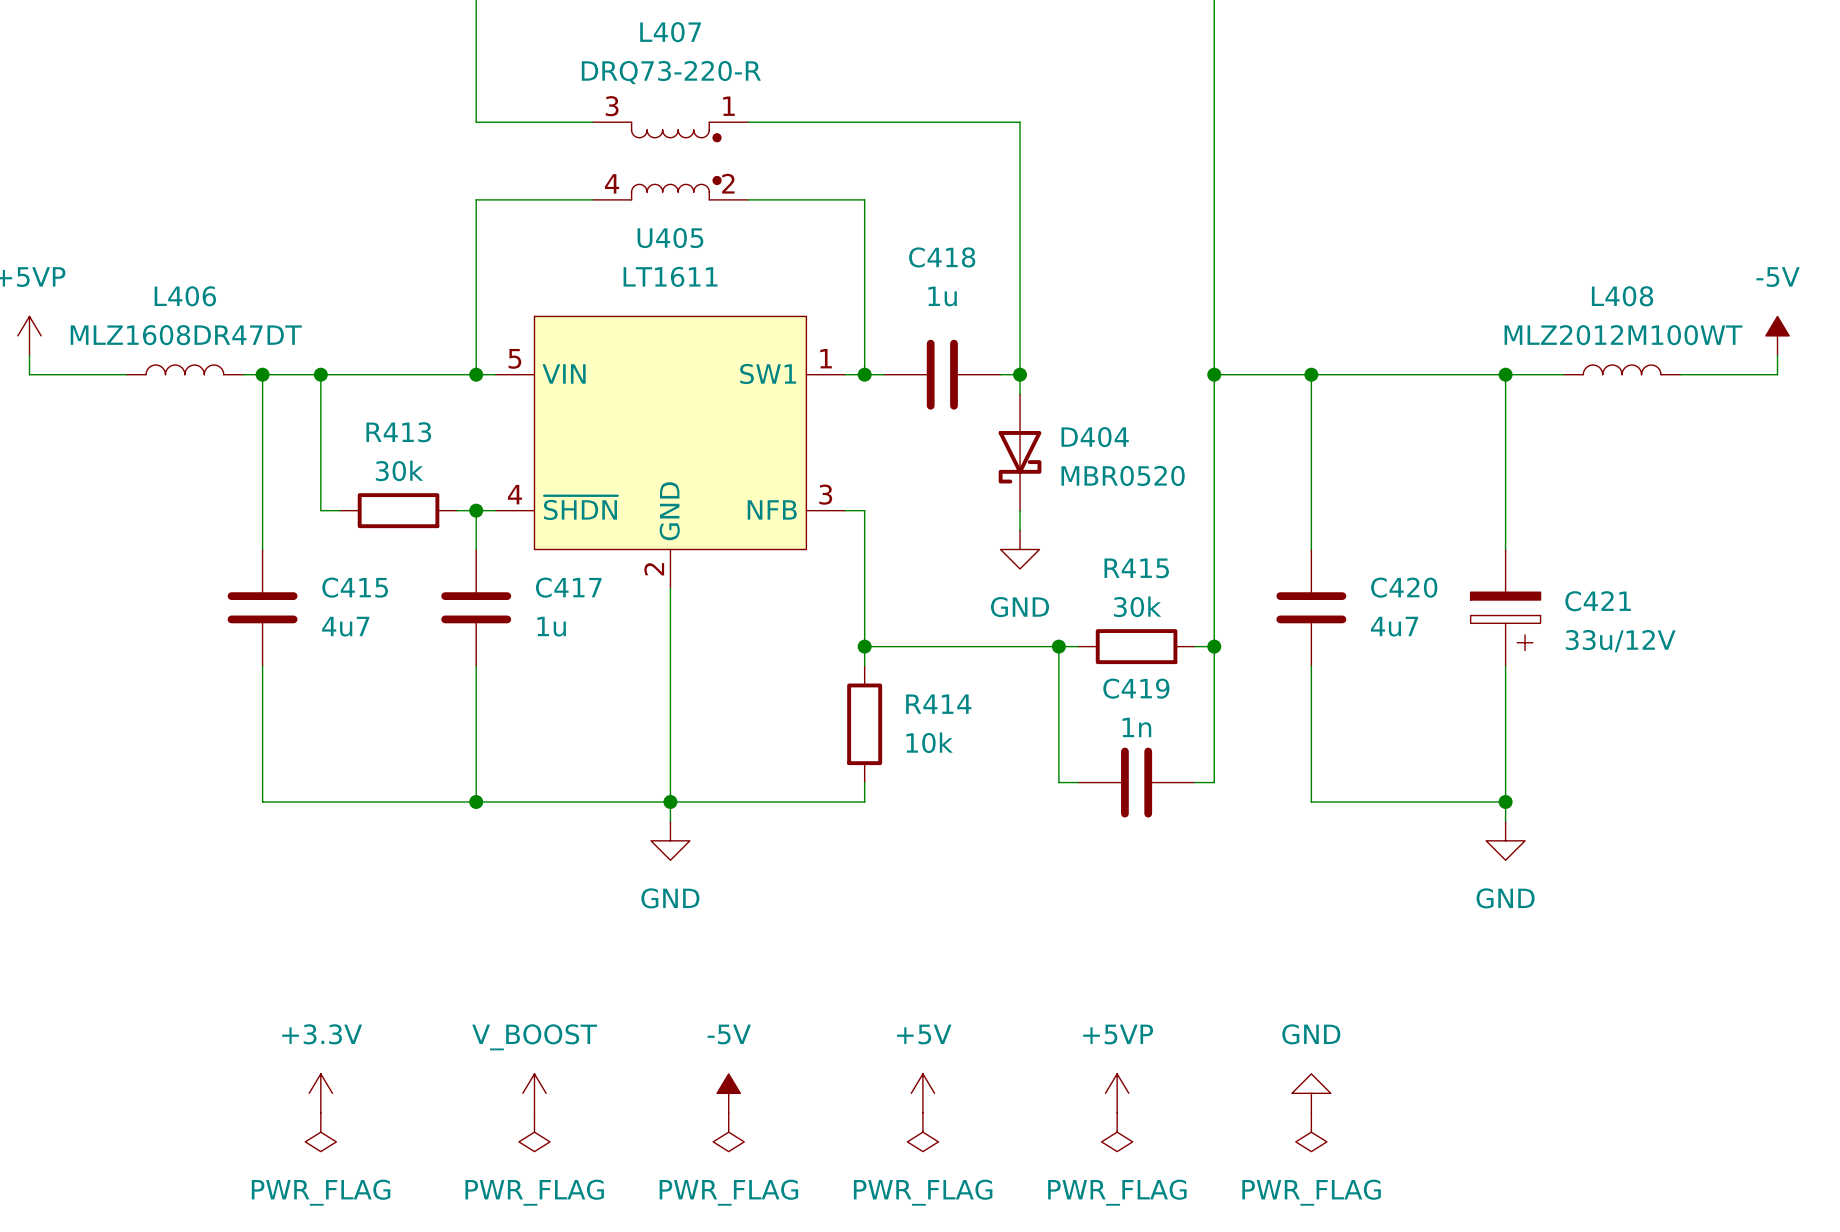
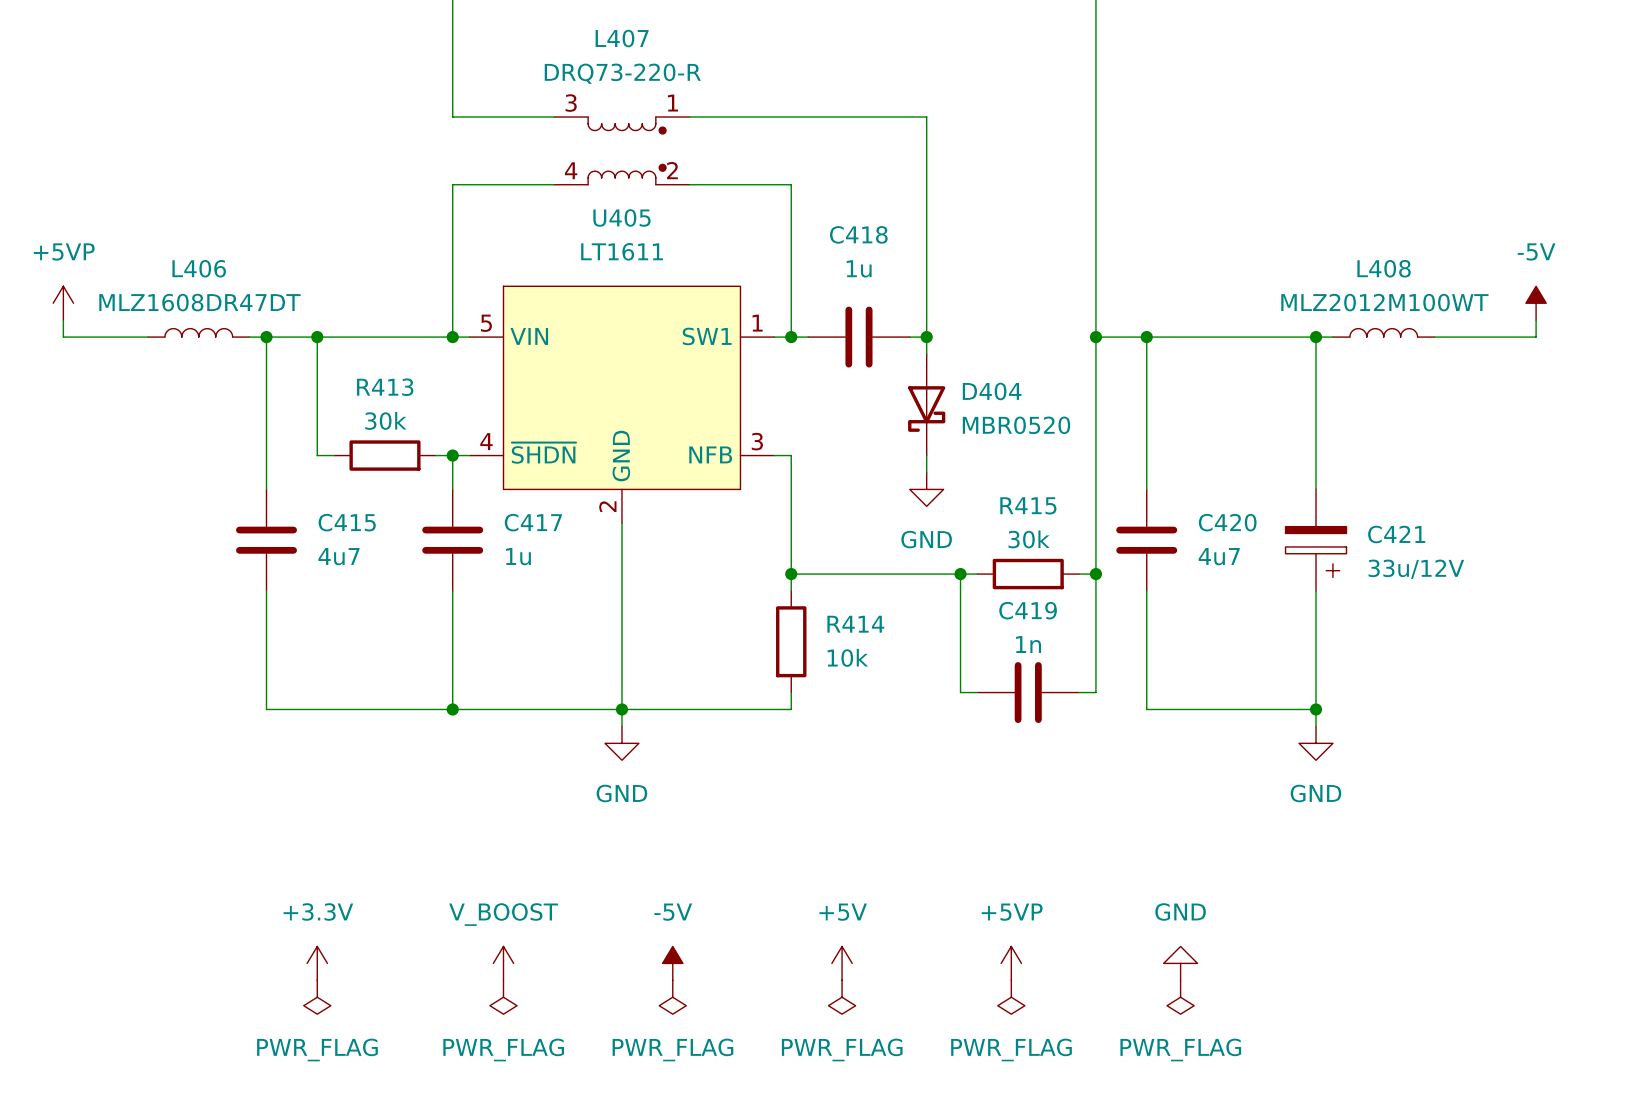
power symbol position: -5V (1777, 335) -> -5V (1536, 303)
wire: (1777, 355) (1777, 374) (1719, 374) -> (1536, 320) (1536, 337)
L408 position: (1622, 369) -> (1383, 332)
wire: (1311, 374) (1311, 549) -> (1146, 337) (1146, 489)
junction position: (1311, 374) -> (1146, 337)
wire: (1486, 374) (1563, 374) -> (1434, 337) (1502, 337)
wire: (1505, 374) (1505, 549) -> (1316, 337) (1316, 489)
junction position: (1505, 374) -> (1316, 337)
C420 position: (1311, 607) -> (1146, 540)
C421 position: (1505, 607) -> (1316, 540)
wire: (1311, 666) (1311, 801) -> (1146, 590) (1146, 709) (1180, 709)
wire: (1505, 666) (1505, 821) -> (1316, 590) (1316, 726)
wire: (1466, 801) (1505, 801) -> none
junction position: (1505, 801) -> (1316, 709)
power symbol position: GND (1505, 840) -> GND (1316, 743)

